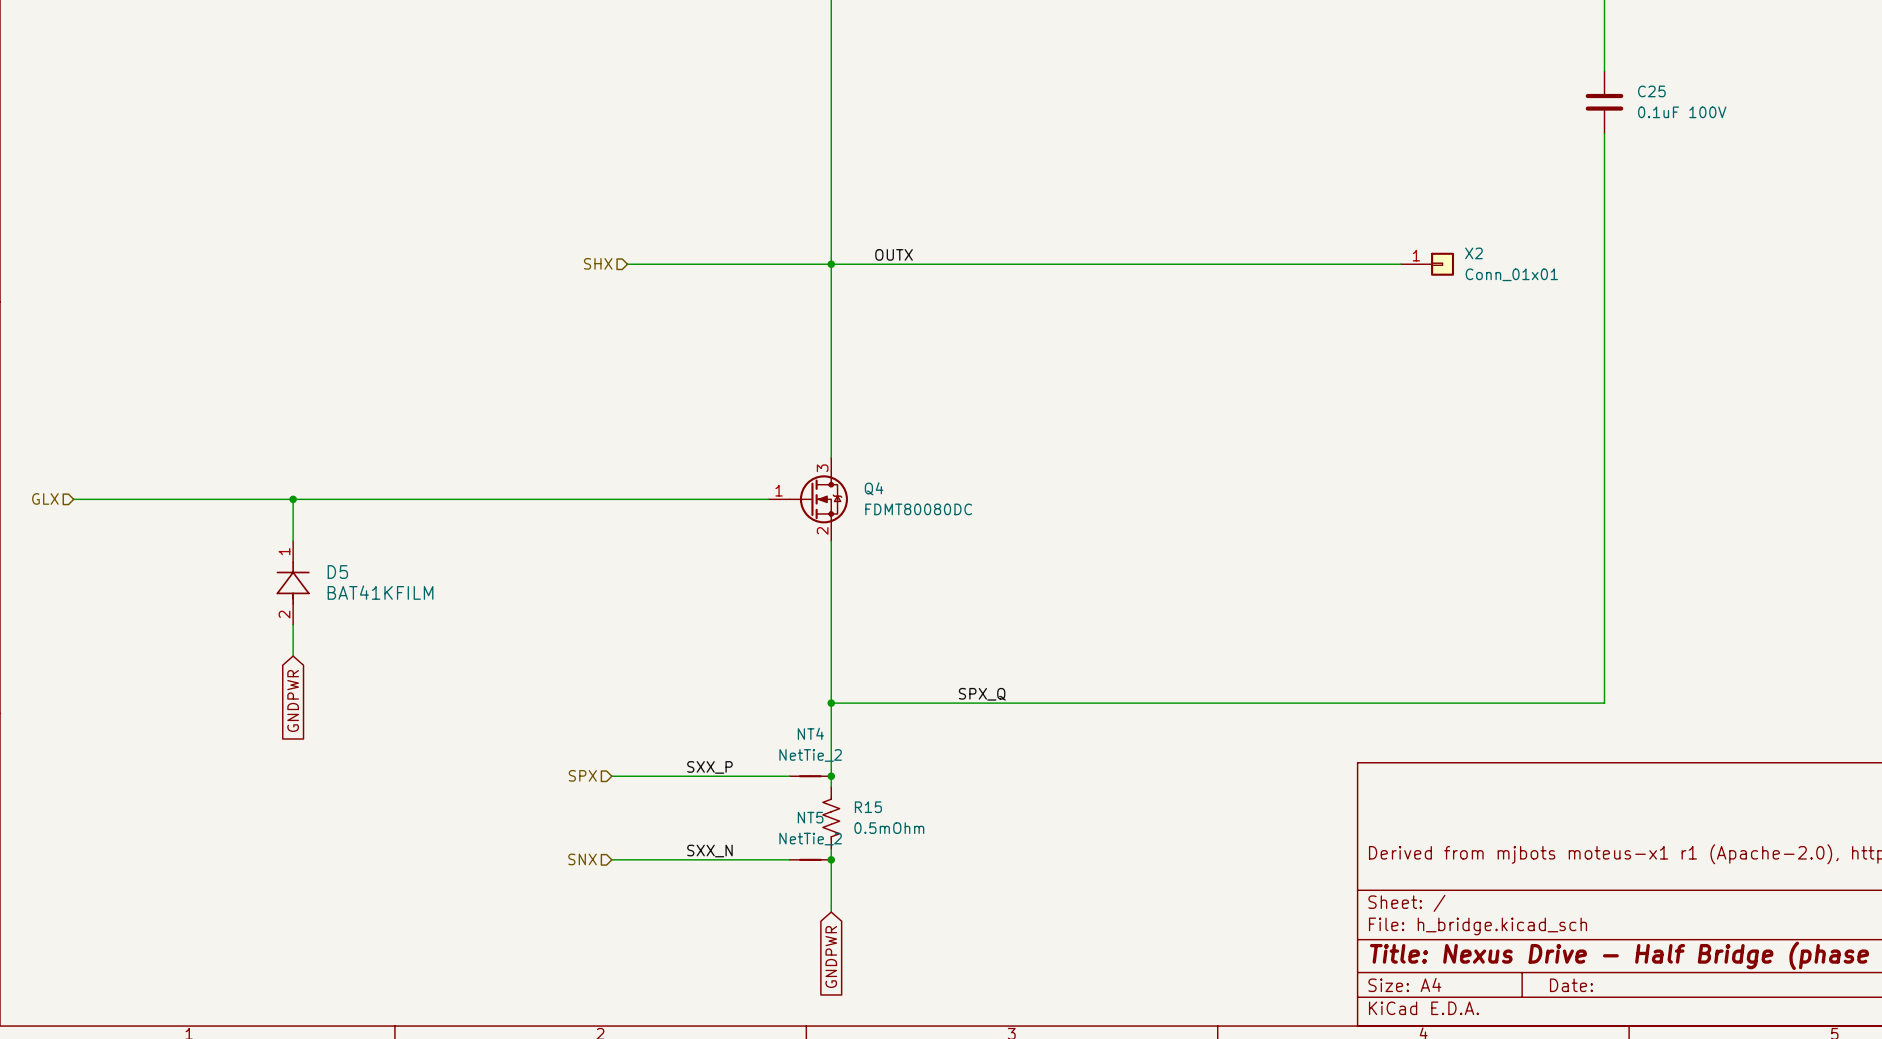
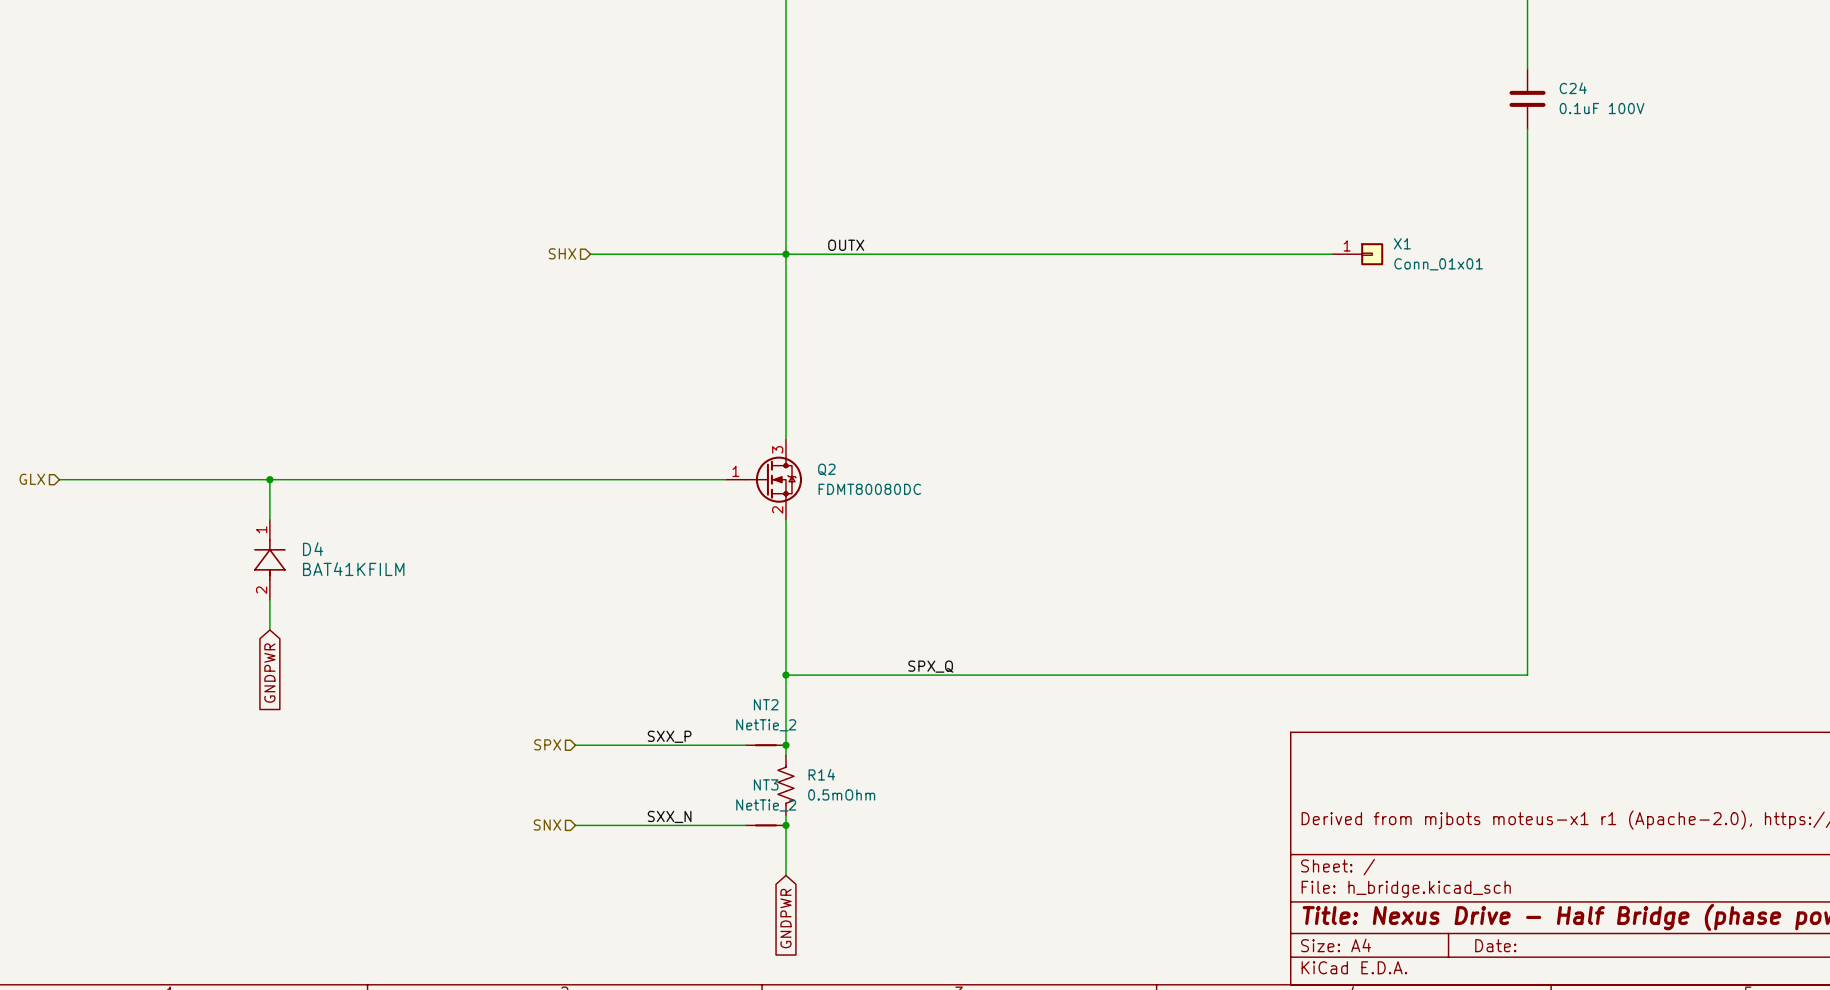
C25 name: C25 (1651, 91) -> C24 (1573, 88)
X2 name: X2 (1473, 253) -> X1 (1402, 243)
Q4 name: Q4 (874, 488) -> Q2 (826, 469)
D5 name: D5 (337, 572) -> D4 (313, 549)
NT4 name: NT4 (810, 733) -> NT2 (766, 704)
R15 name: R15 (868, 807) -> R14 (821, 774)
NT5 name: NT5 (810, 817) -> NT3 (766, 784)

